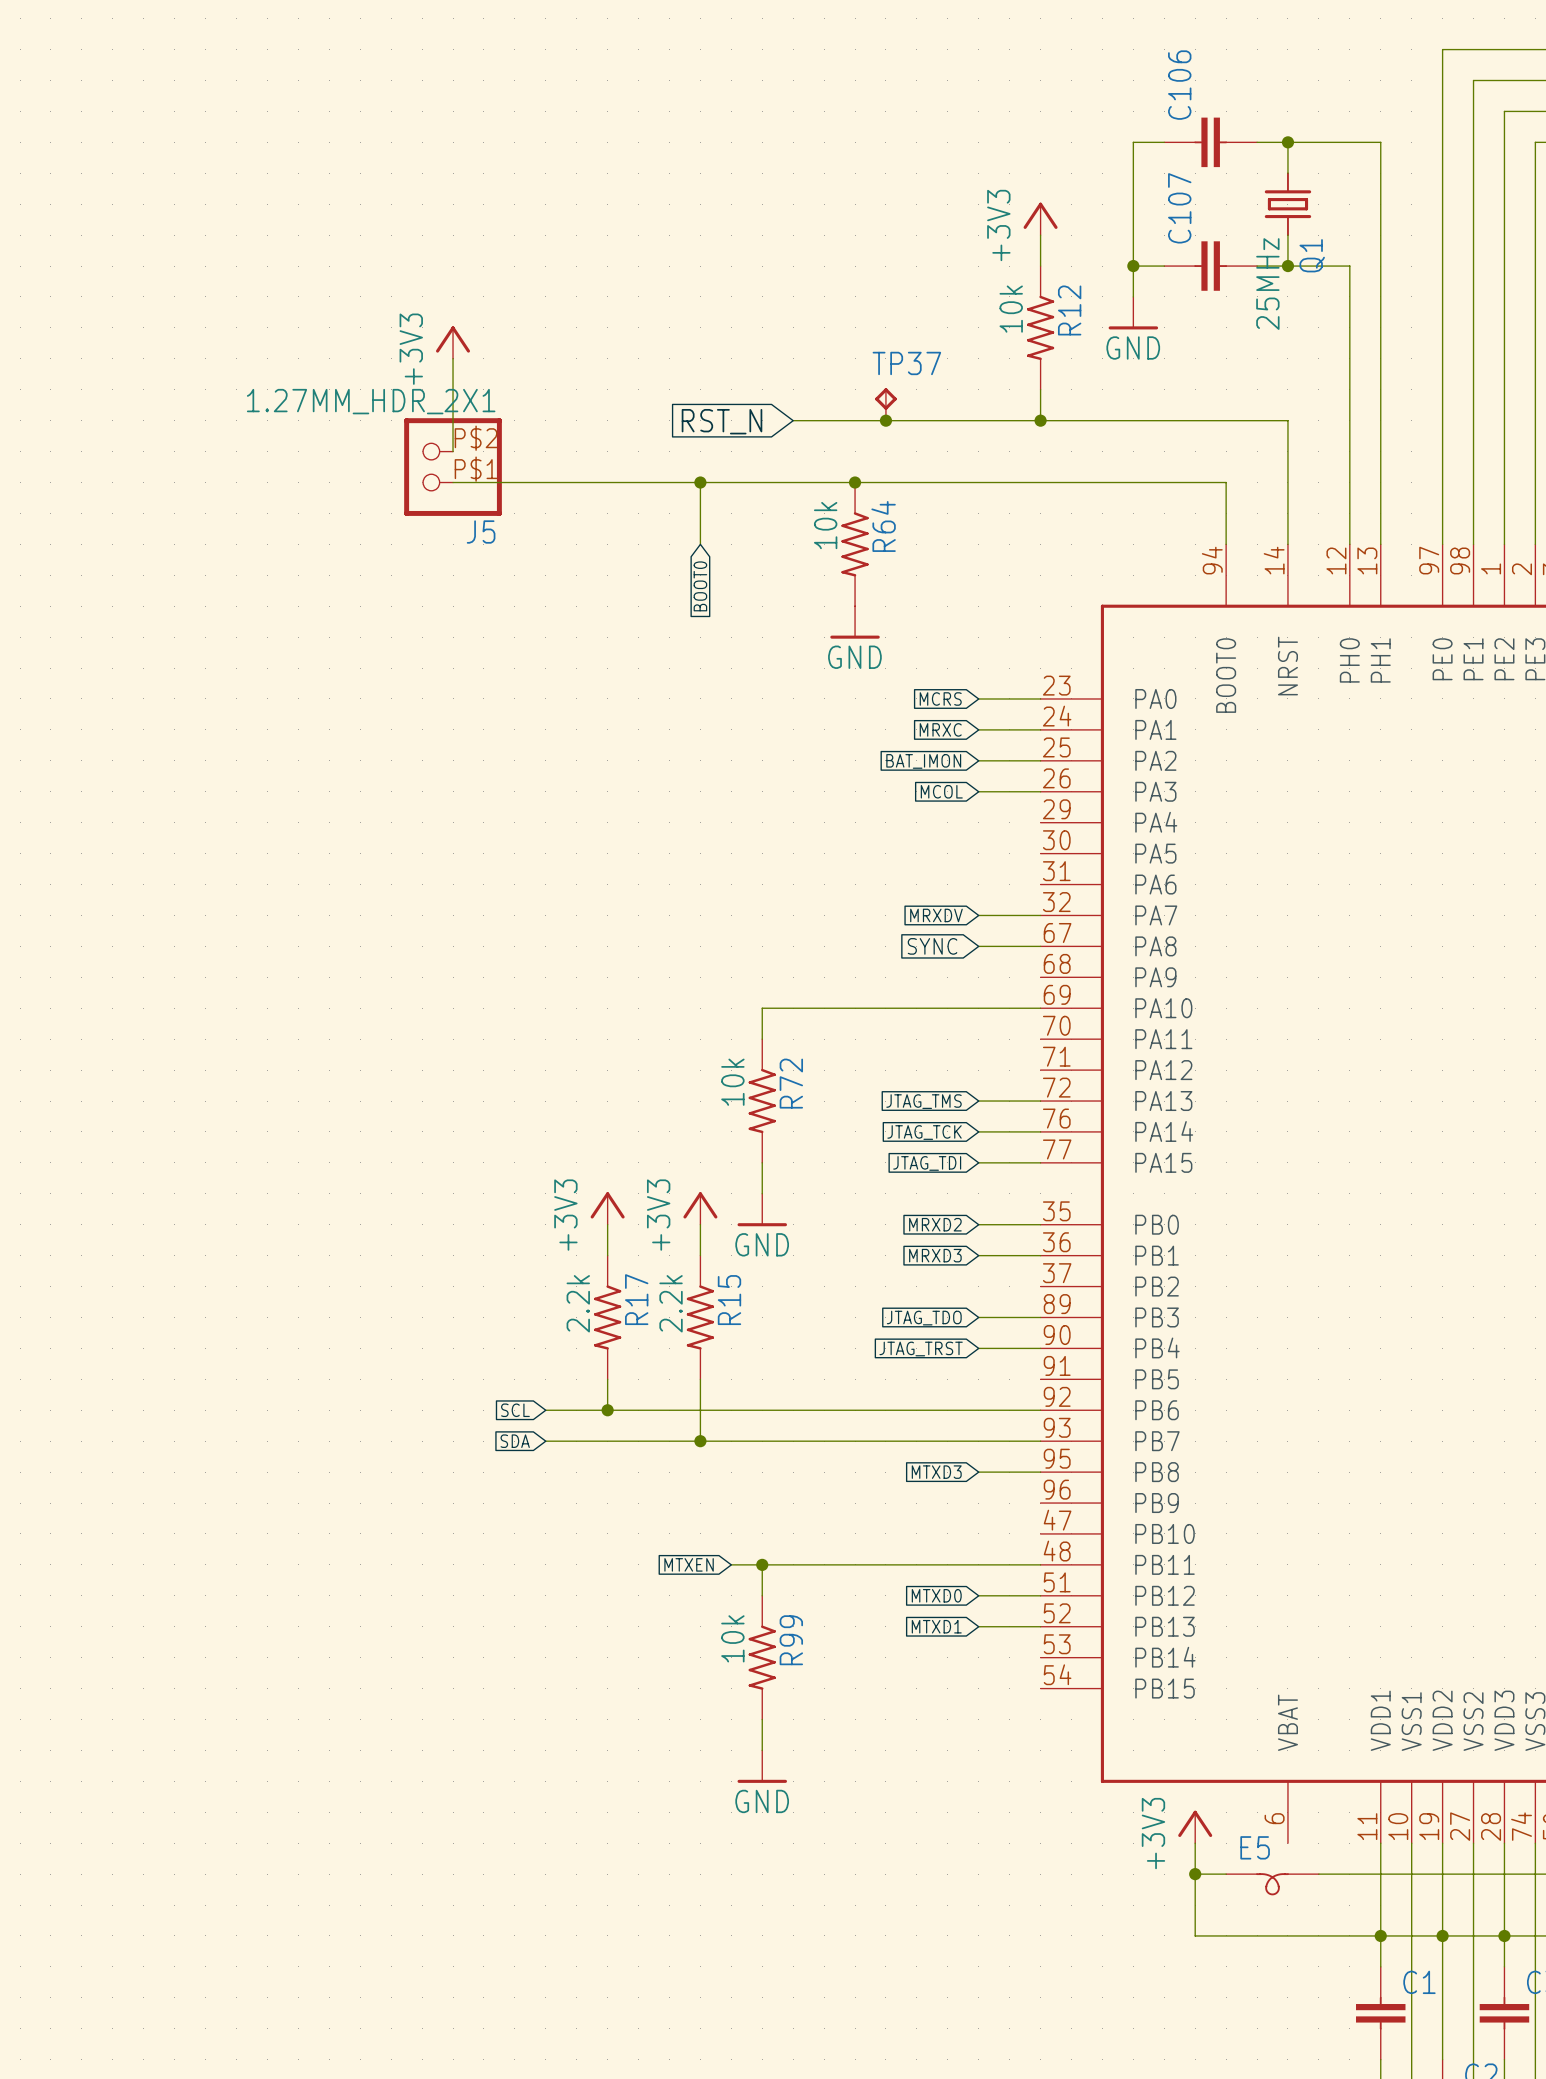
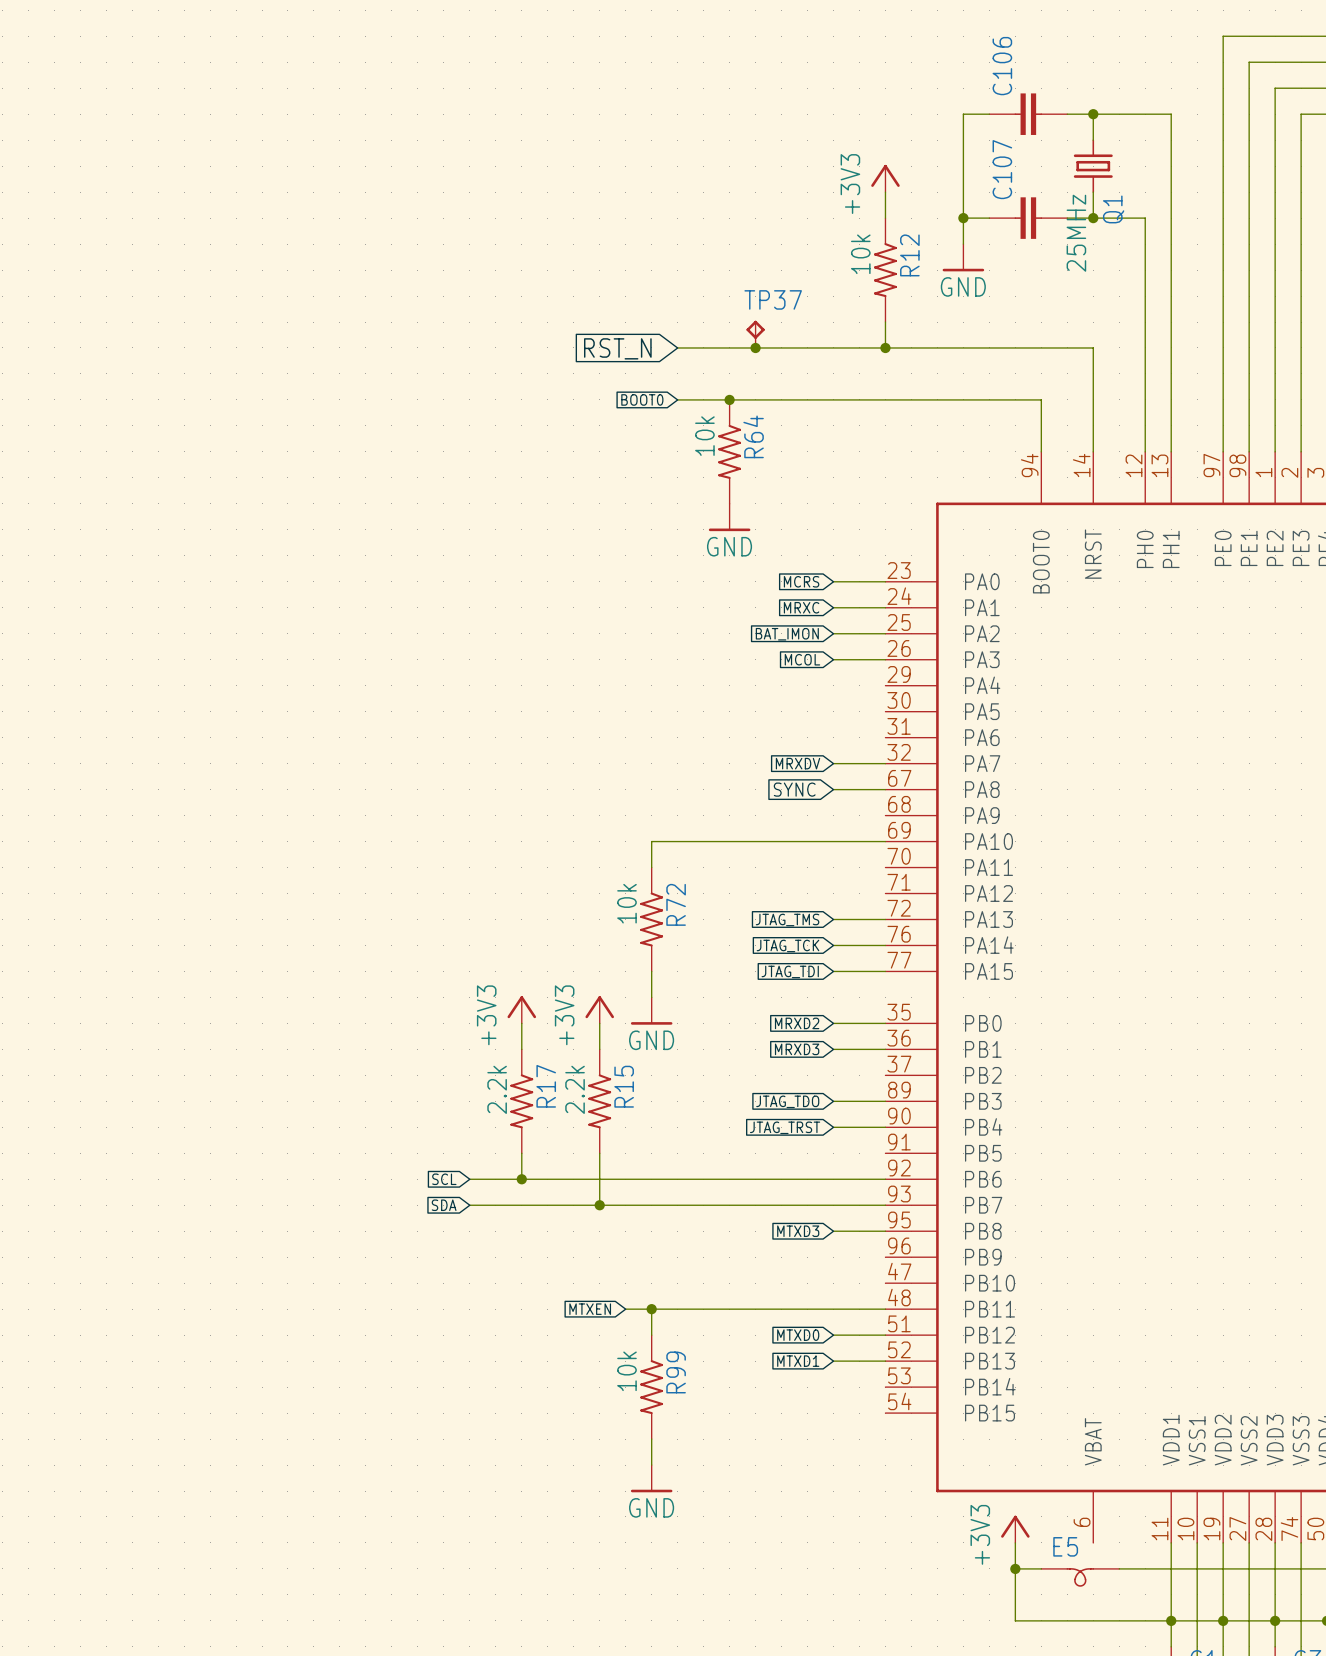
power symbol: +3V3 (453, 342) -> none
wire: (453, 358) (453, 451) -> none
J5: 1.27MM_HDR_2X1 (453, 467) -> none
wire: (453, 482) (793, 482) -> none
wire: (700, 482) (700, 544) -> none
junction: (700, 482) -> none
global label rotation: 0° (700, 586) -> 90° clockwise (642, 399)
global label position: BOOT0 (700, 586) -> BOOT0 (642, 399)

